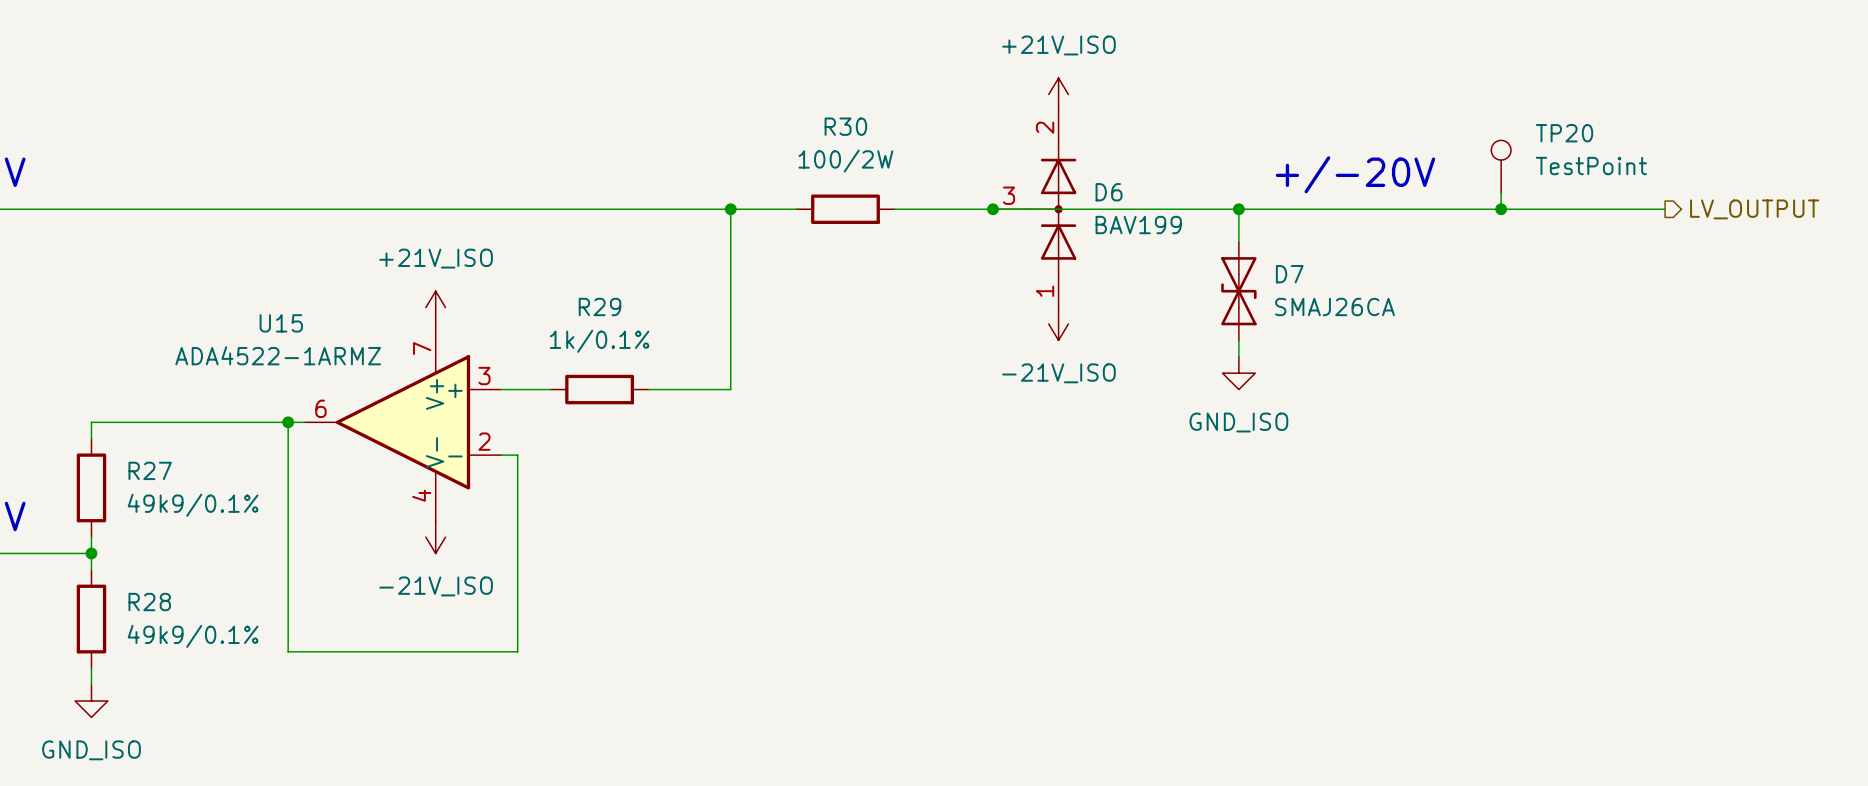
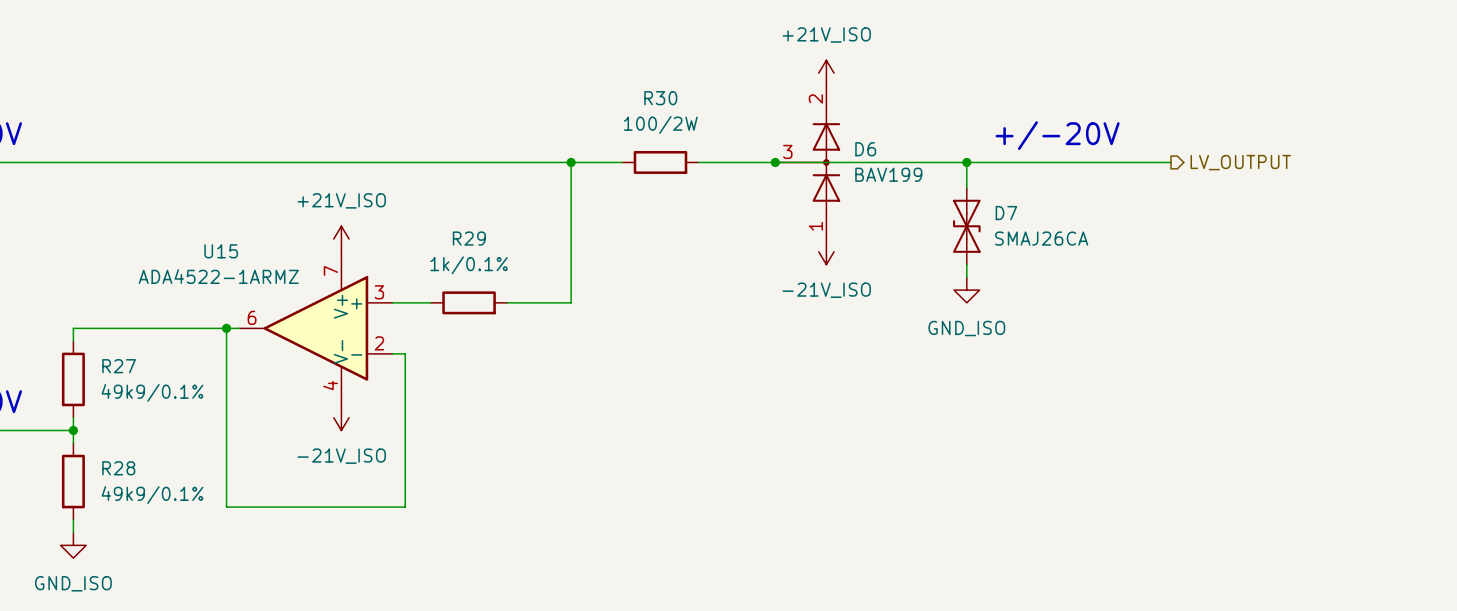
TP20: TestPoint (1501, 166) -> none
wire: (1501, 192) (1501, 209) (1665, 209) -> none
junction: (1501, 209) -> none
hierarchical label position: LV_OUTPUT (1754, 209) -> LV_OUTPUT (1240, 162)

